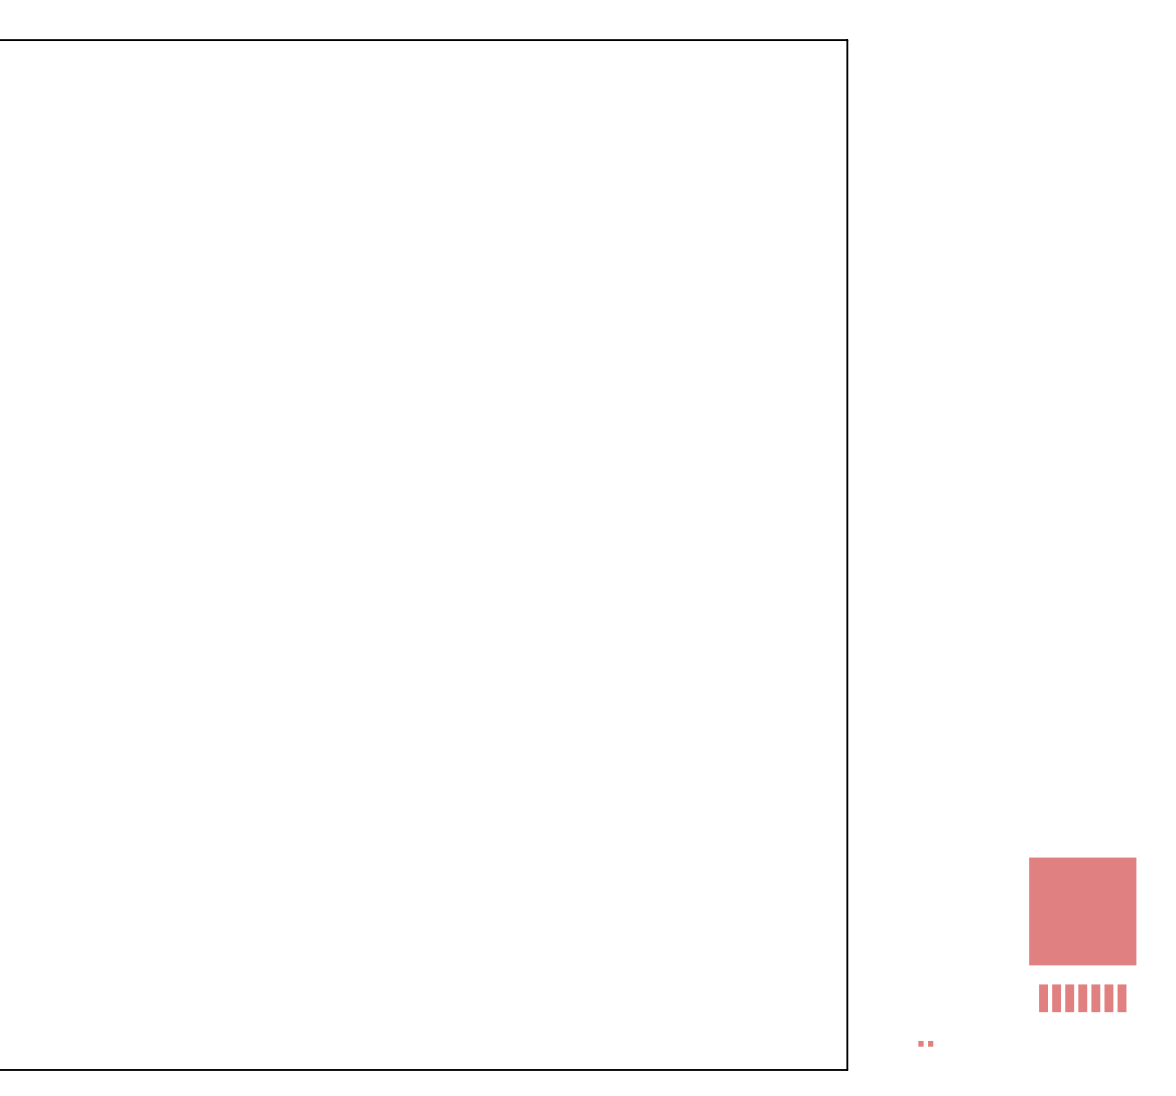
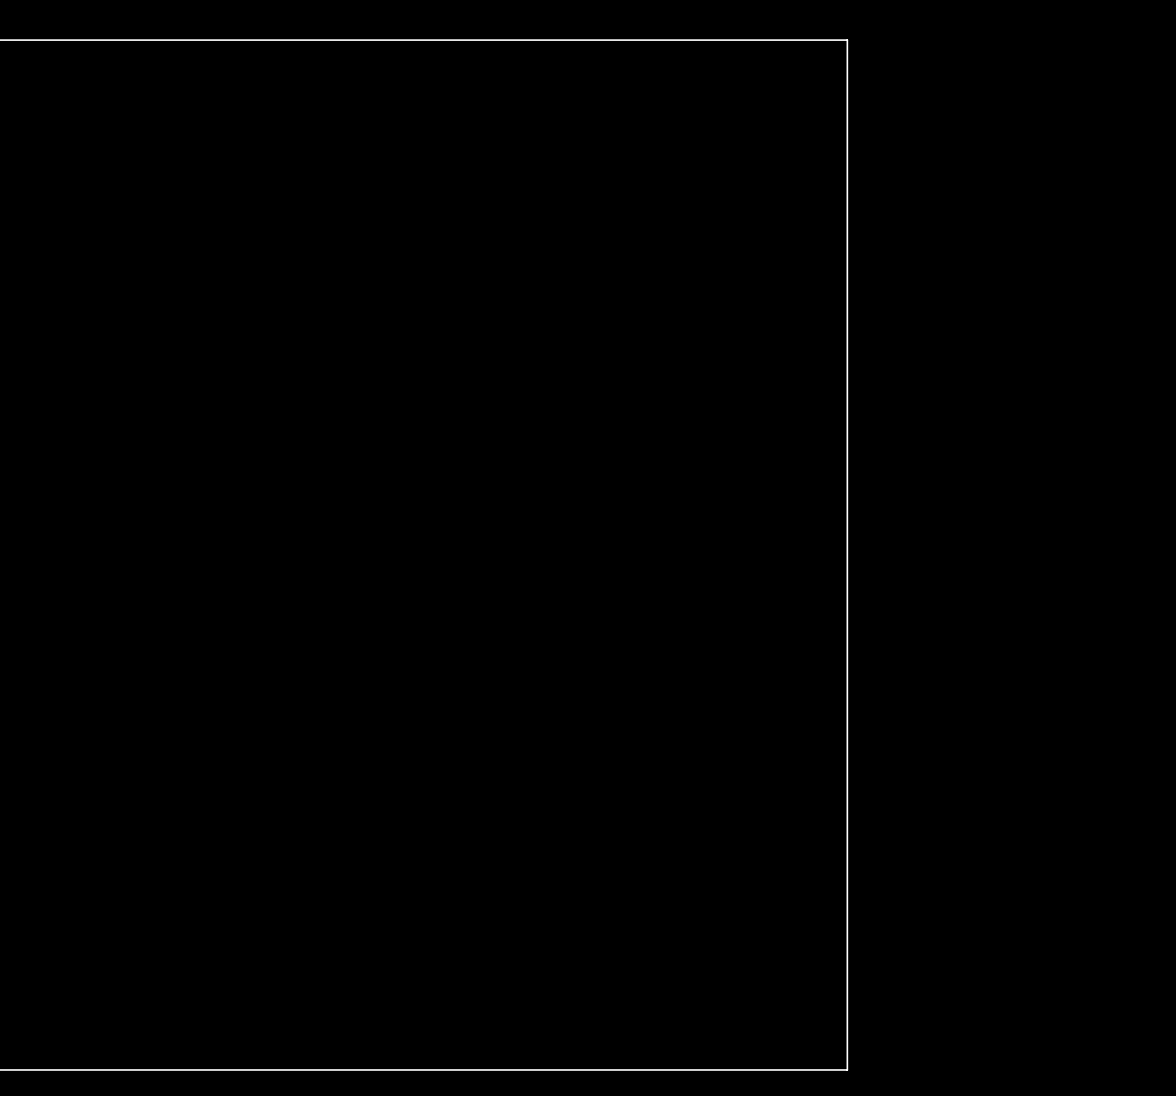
part: (1082, 934) -> none
part: (925, 1043) -> none

